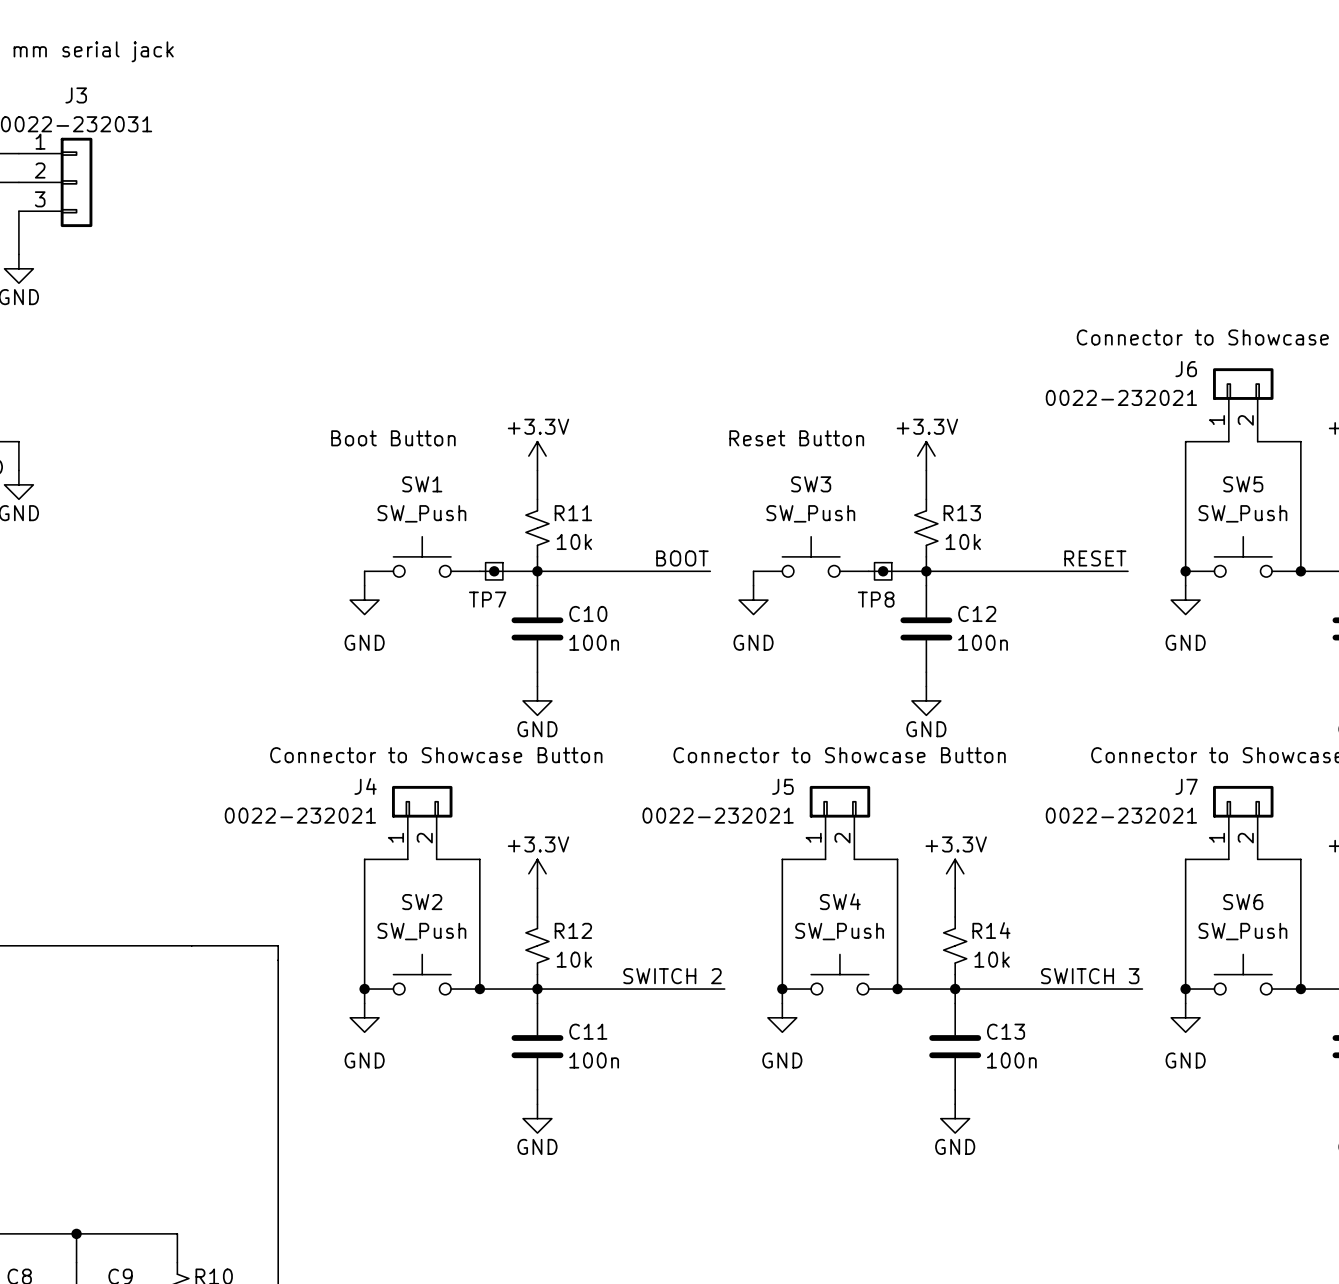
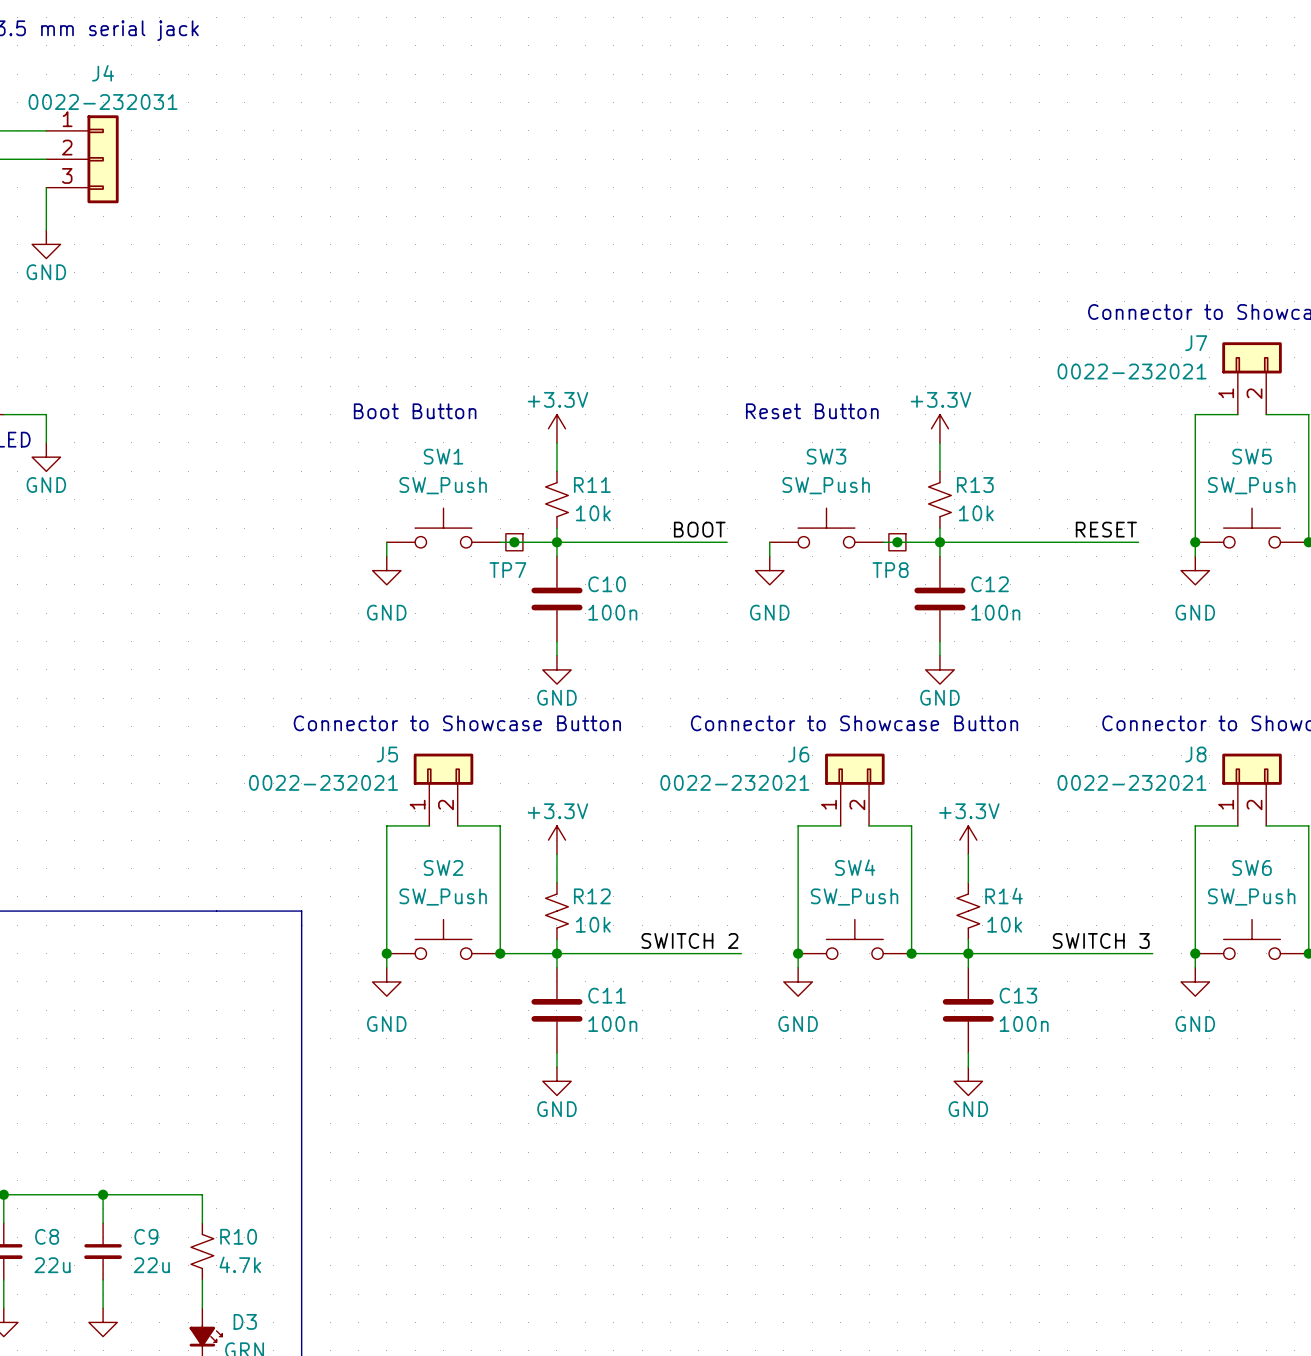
J3 name: J3 (76, 95) -> J4 (103, 73)
J6 name: J6 (1186, 369) -> J7 (1196, 343)
J4 name: J4 (365, 786) -> J5 (387, 754)
J5 name: J5 (782, 786) -> J6 (798, 754)
J7 name: J7 (1186, 786) -> J8 (1195, 754)

